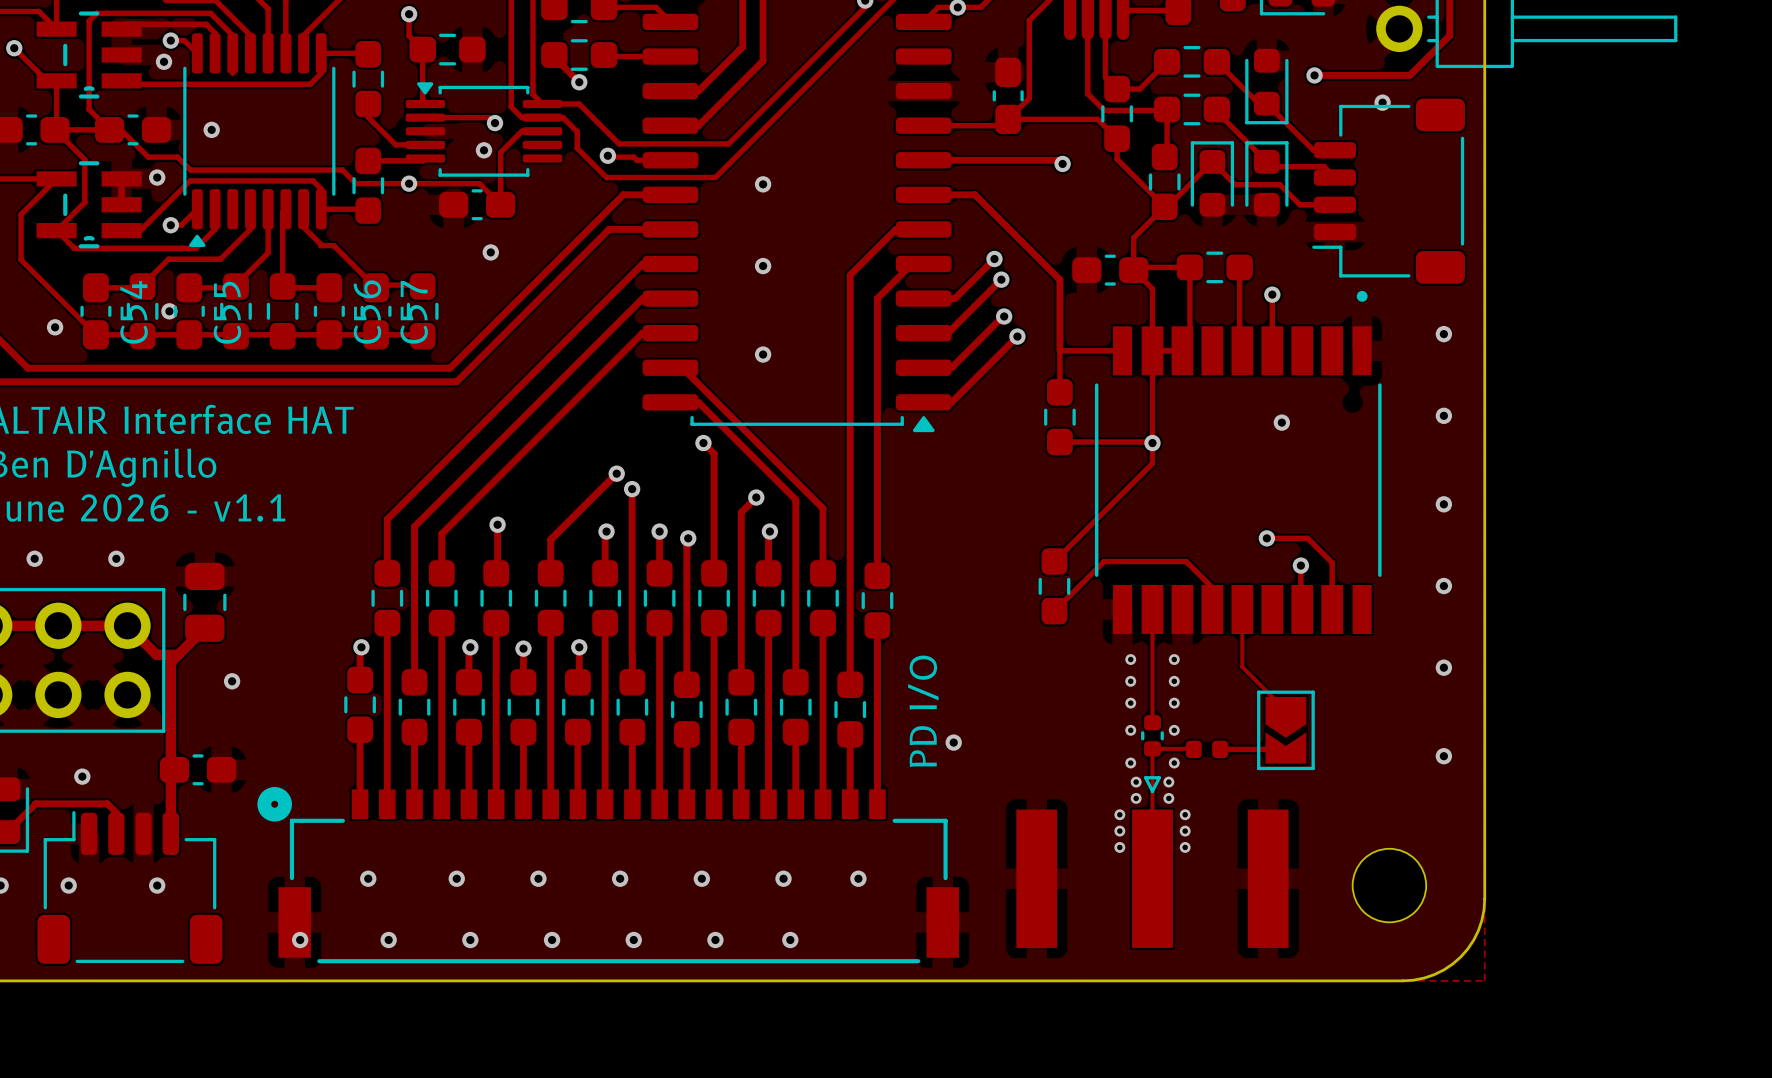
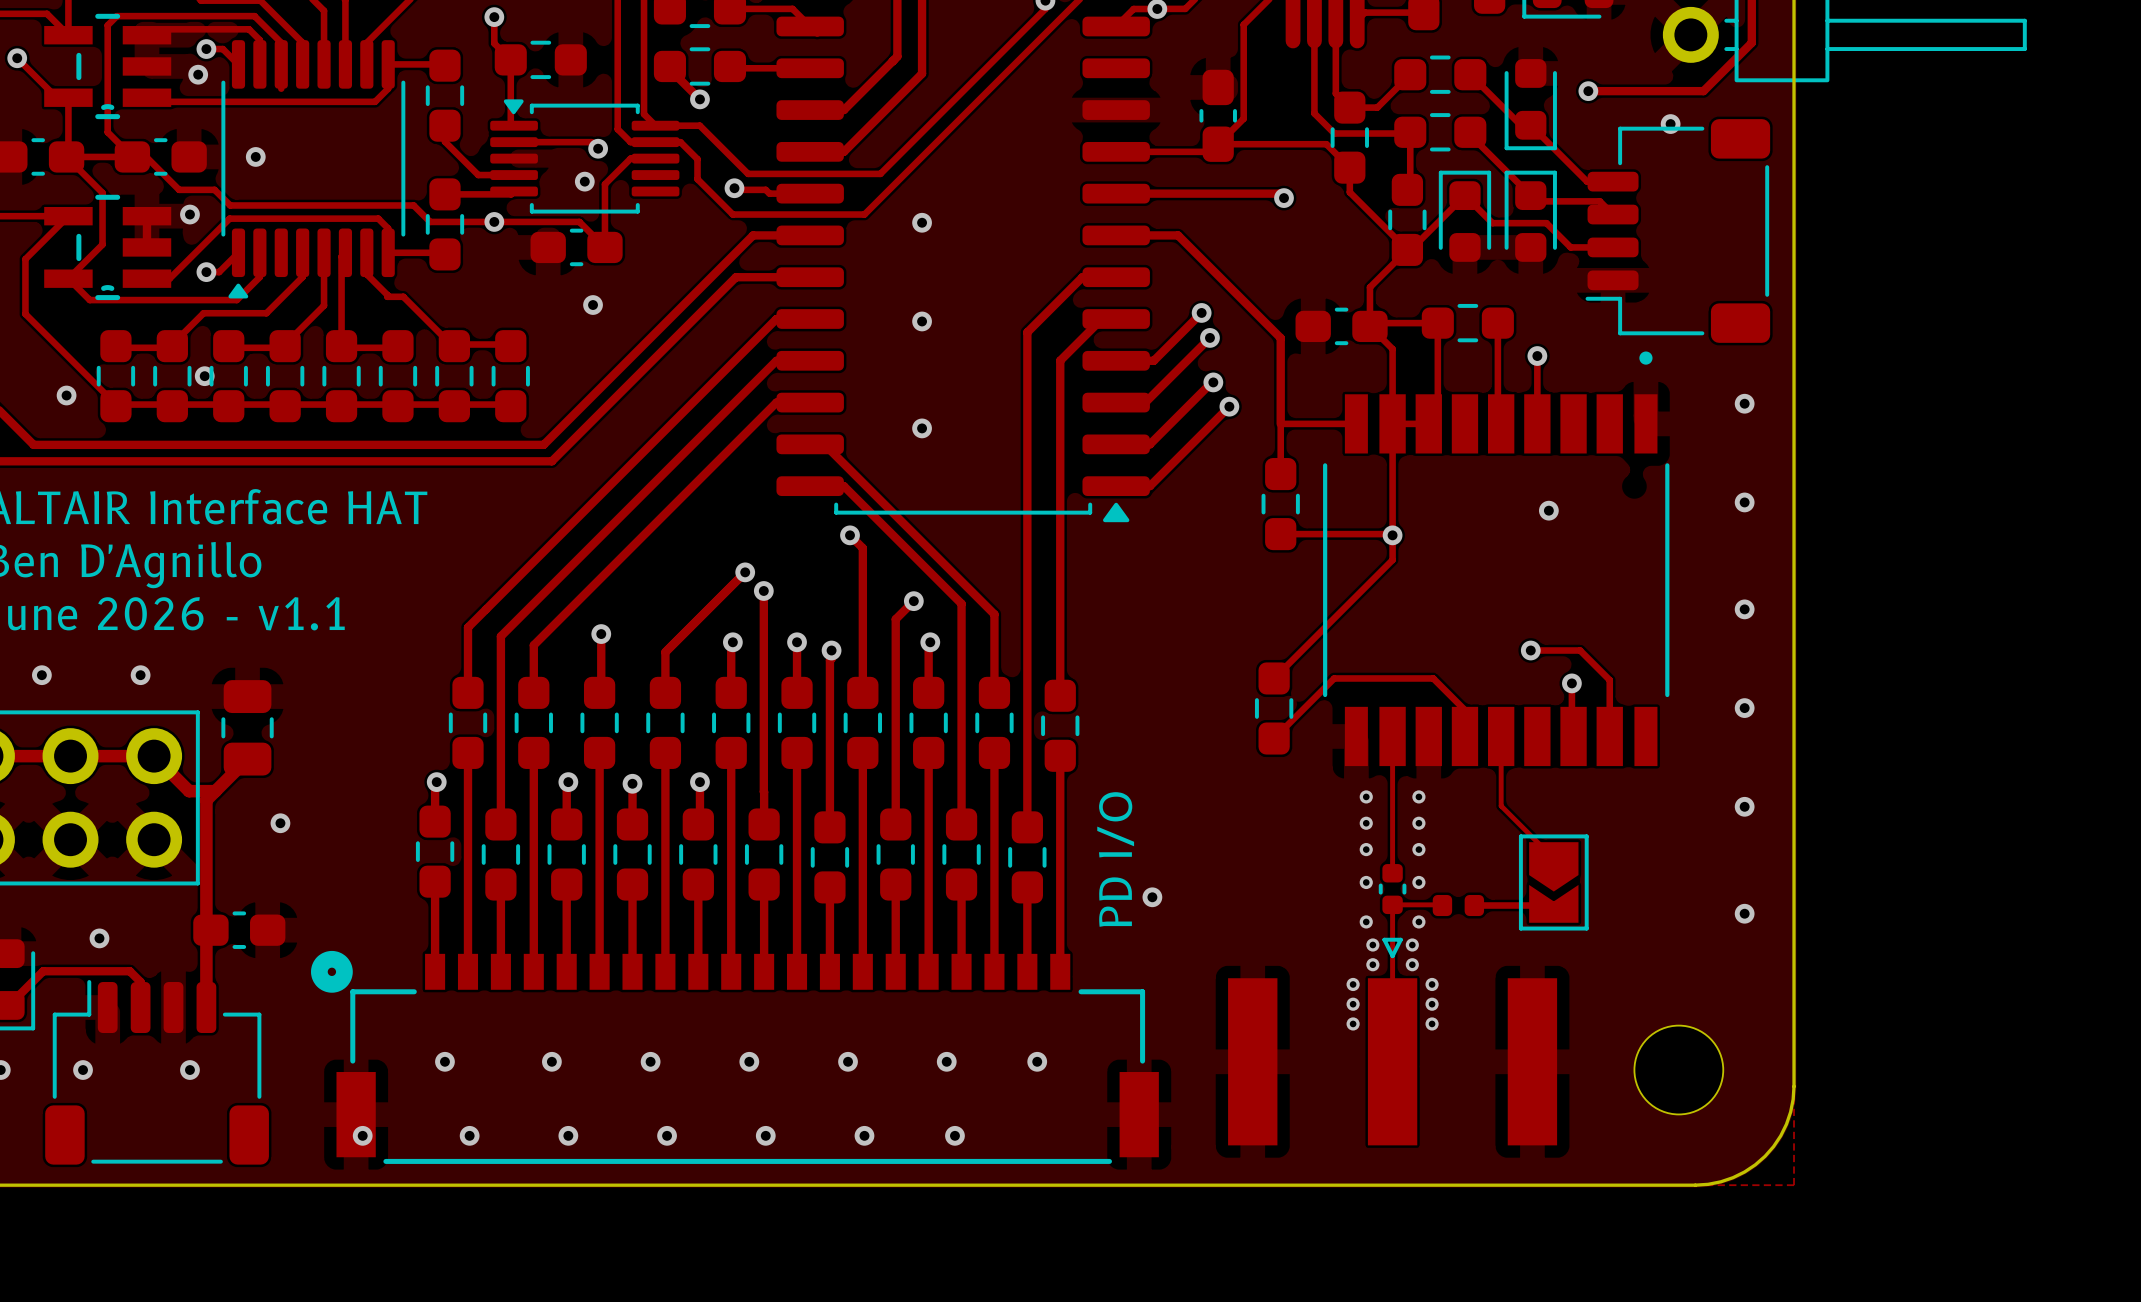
C54: (95, 311) -> none
part: none -> (115, 376)
C55: (189, 311) -> none
part: none -> (228, 376)
C56: (329, 311) -> none
part: none -> (397, 376)
C57: (376, 311) -> none
part: none -> (454, 376)

